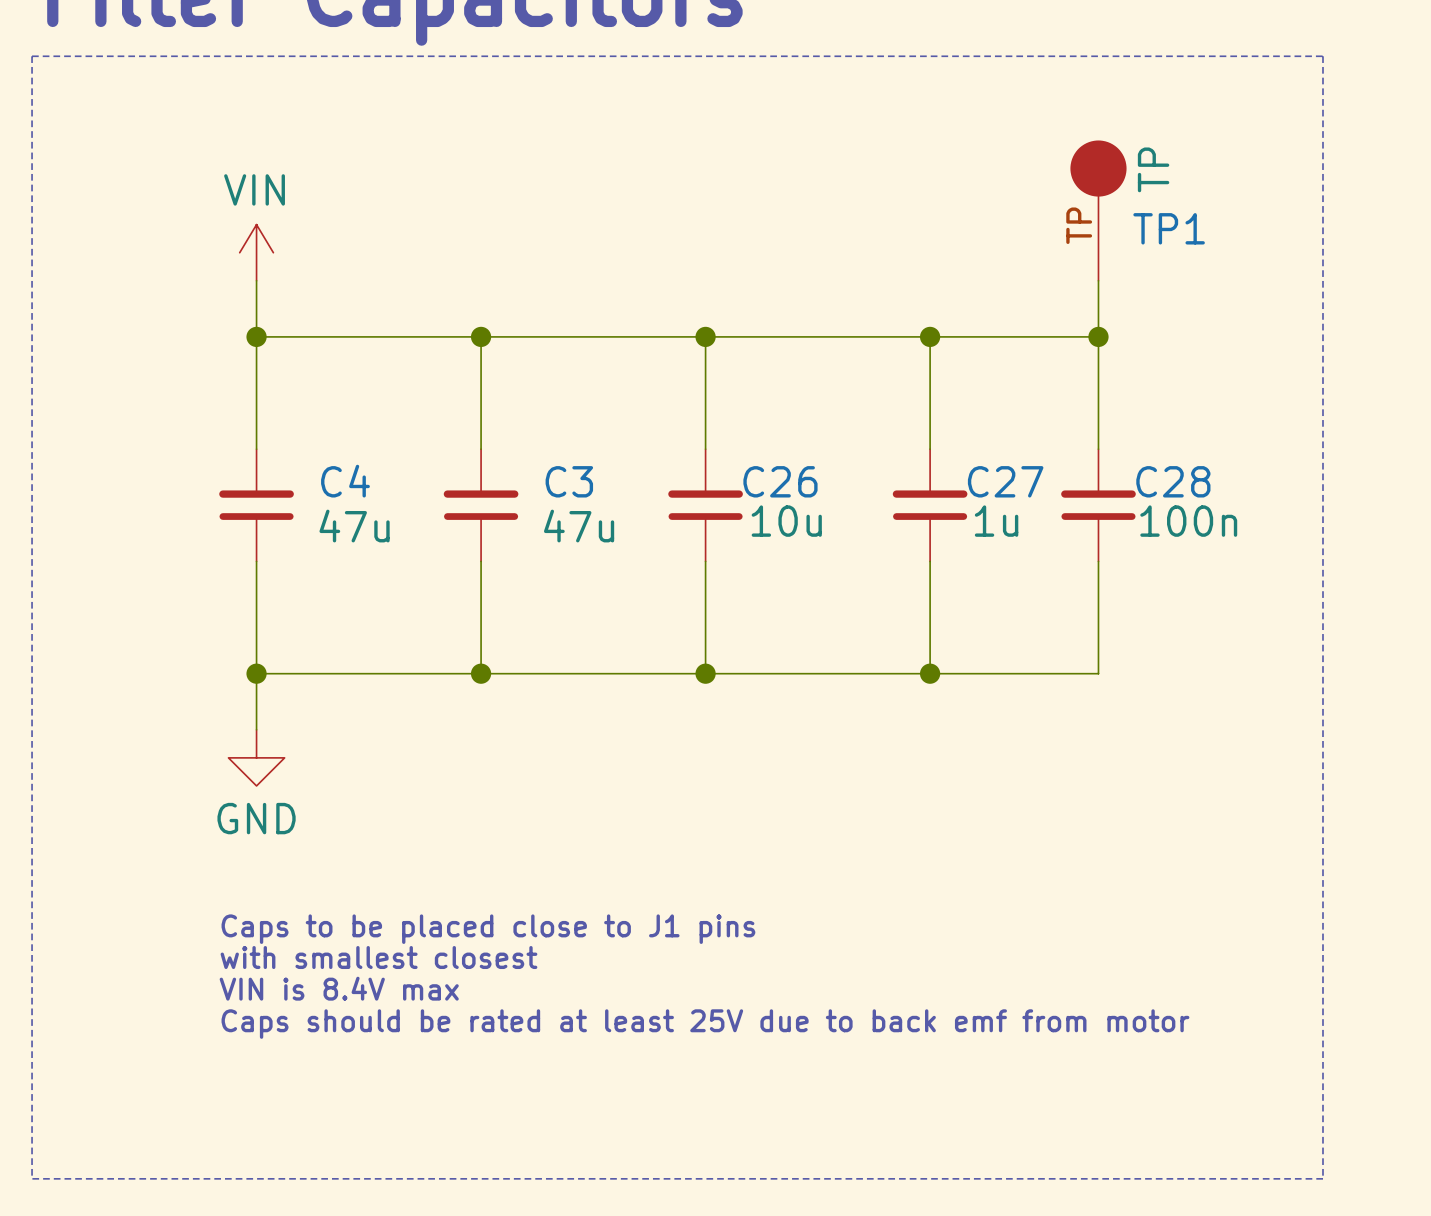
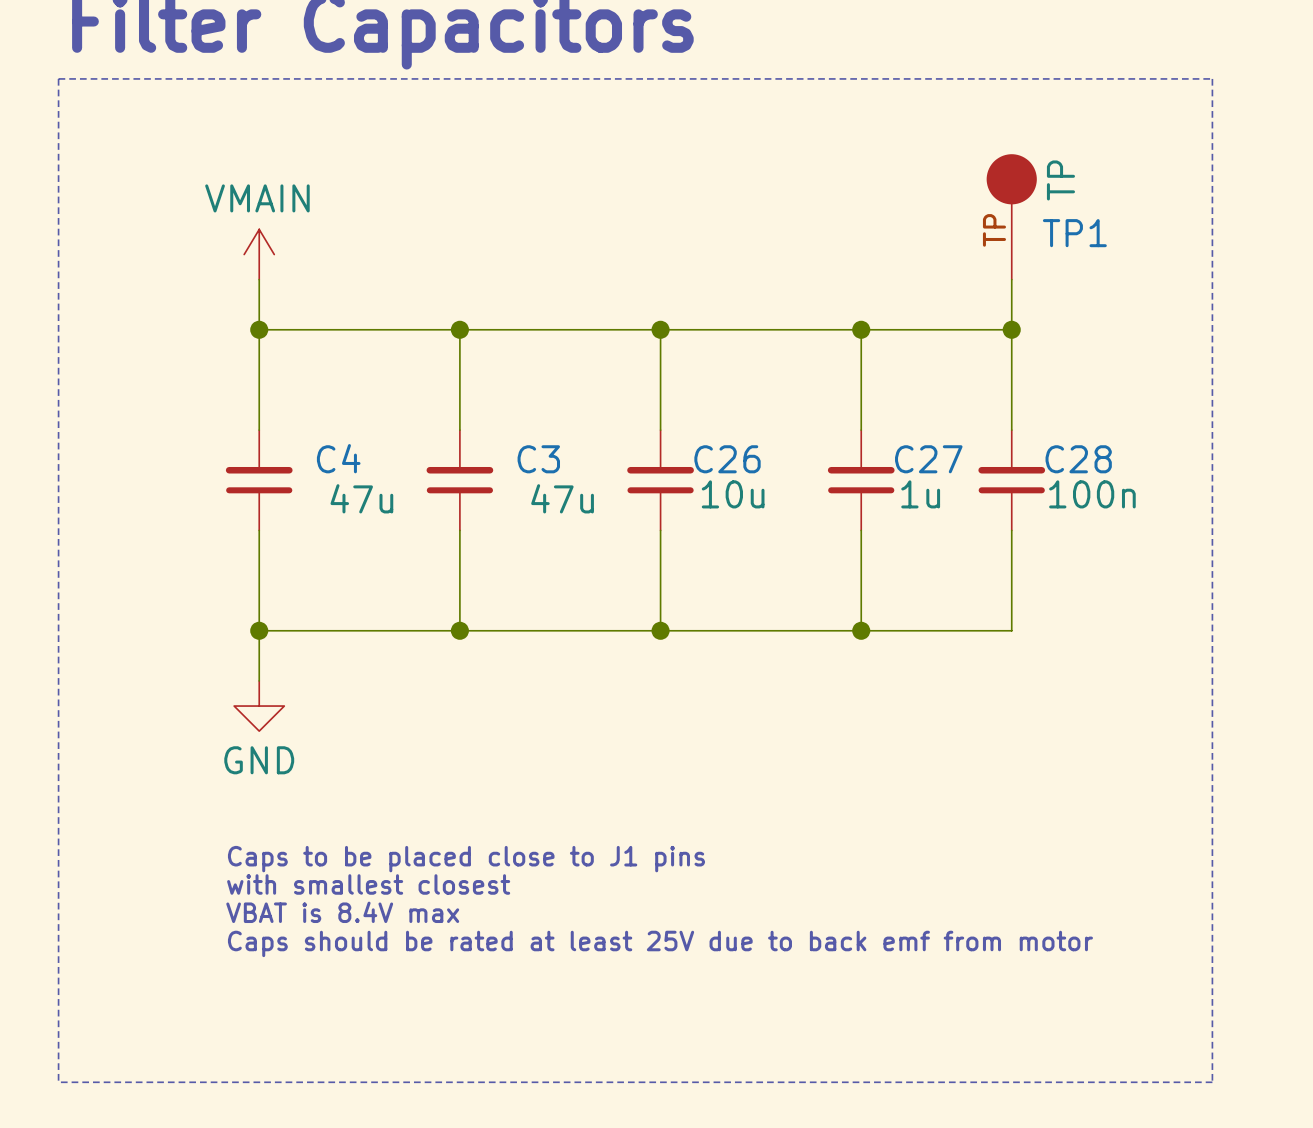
power symbol: VIN (256, 252) -> VMAIN (259, 254)
C4 value position: 47u (354, 526) -> 47u (361, 498)
C3 value position: 47u (579, 526) -> 47u (562, 498)
text: VIN is 8.4V max (339, 988) -> VBAT is 8.4V max (342, 912)

